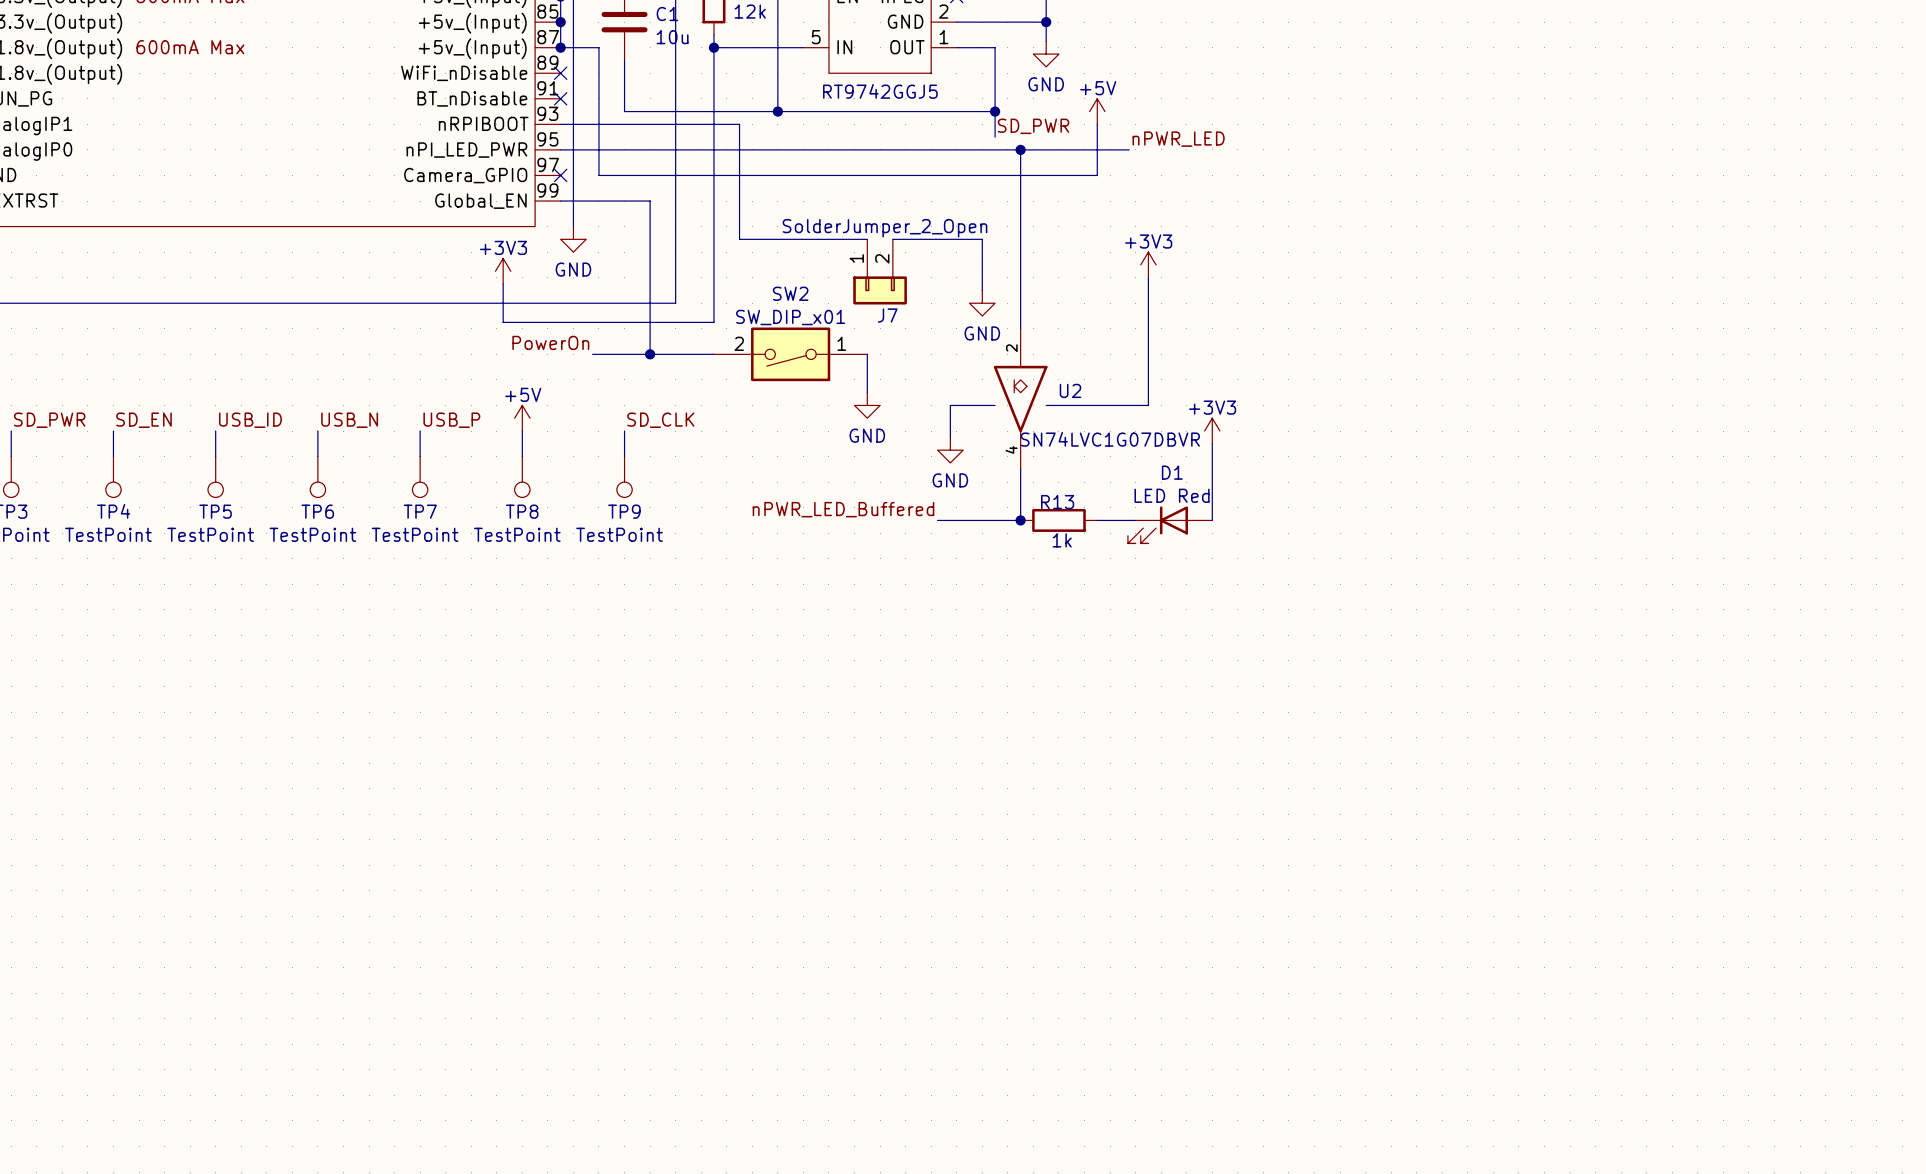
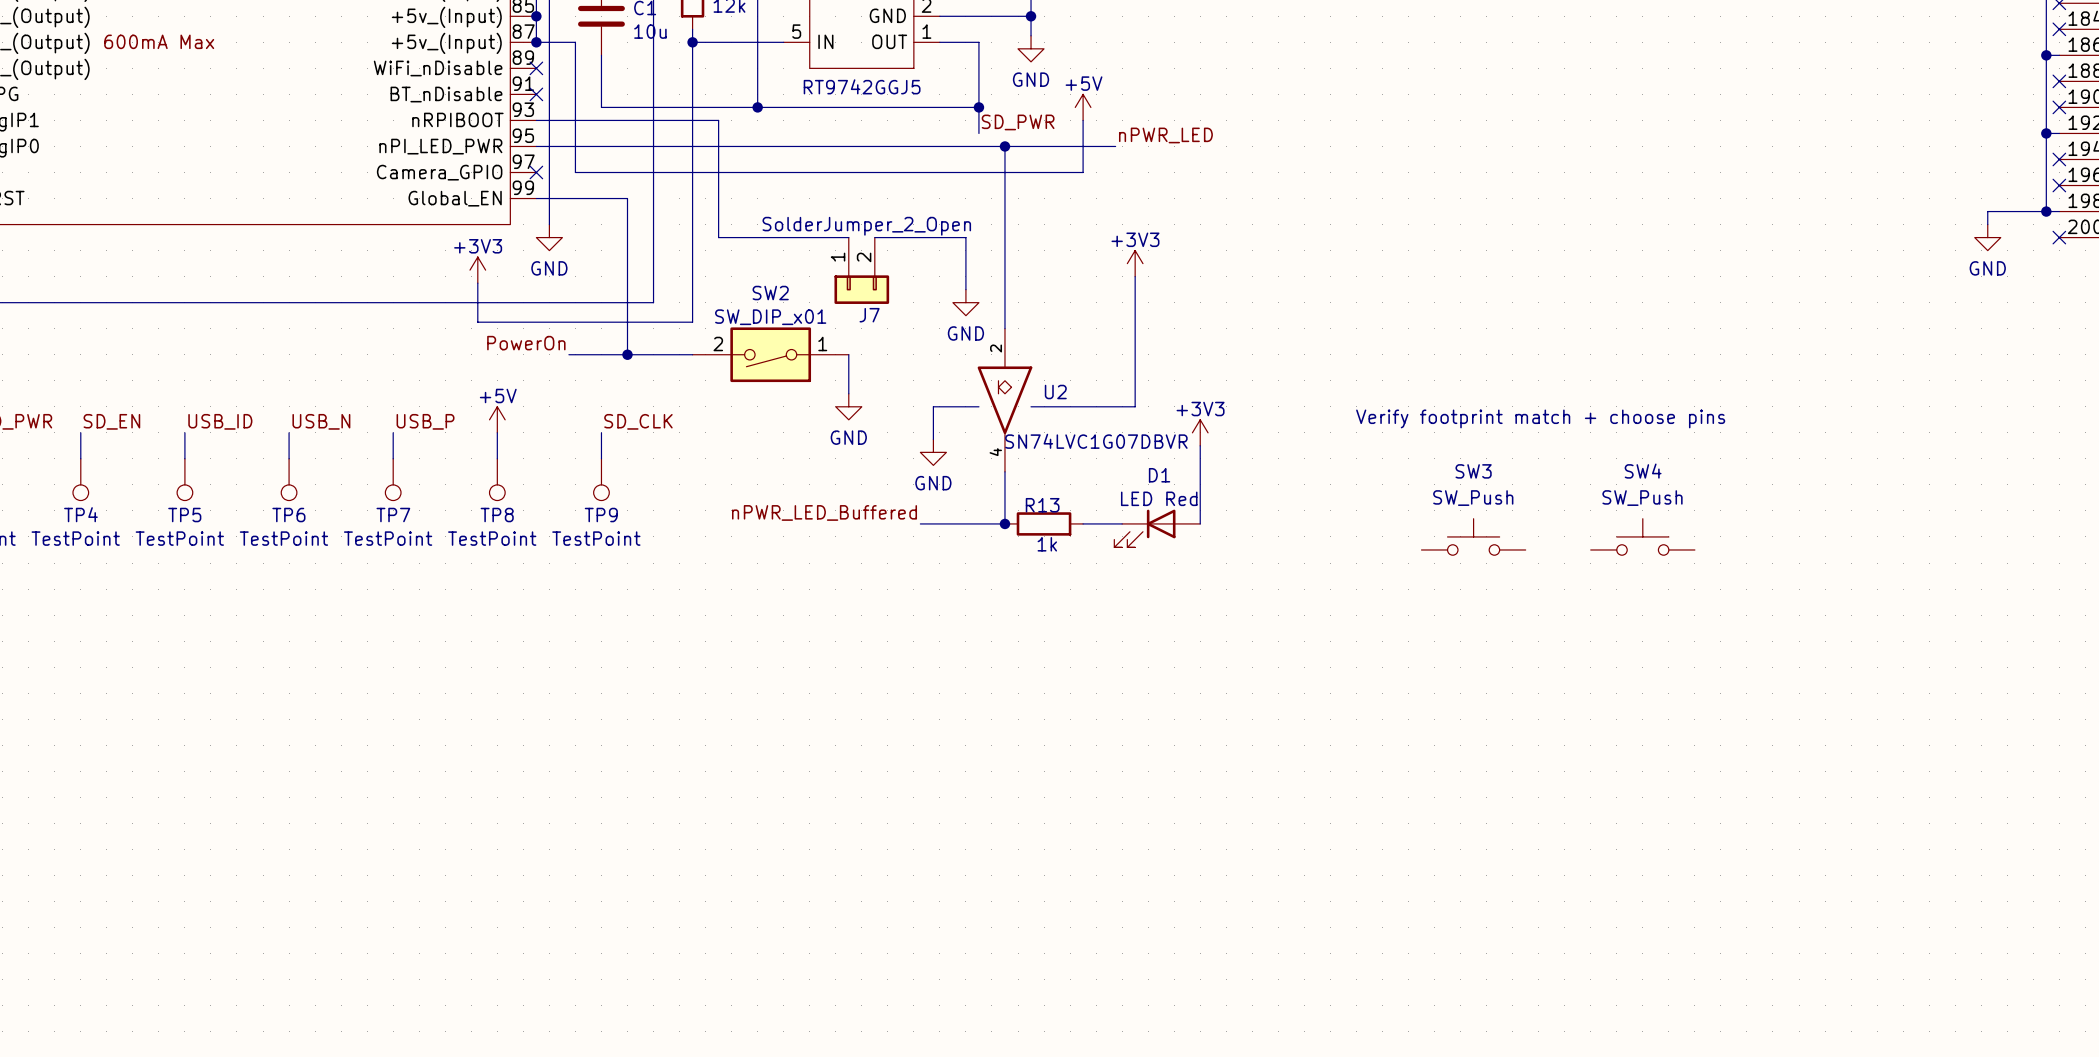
text: none -> Verify footprint match + choose pins (1540, 418)
SW3: none -> SW_Push (1473, 536)
SW4: none -> SW_Push (1642, 536)

